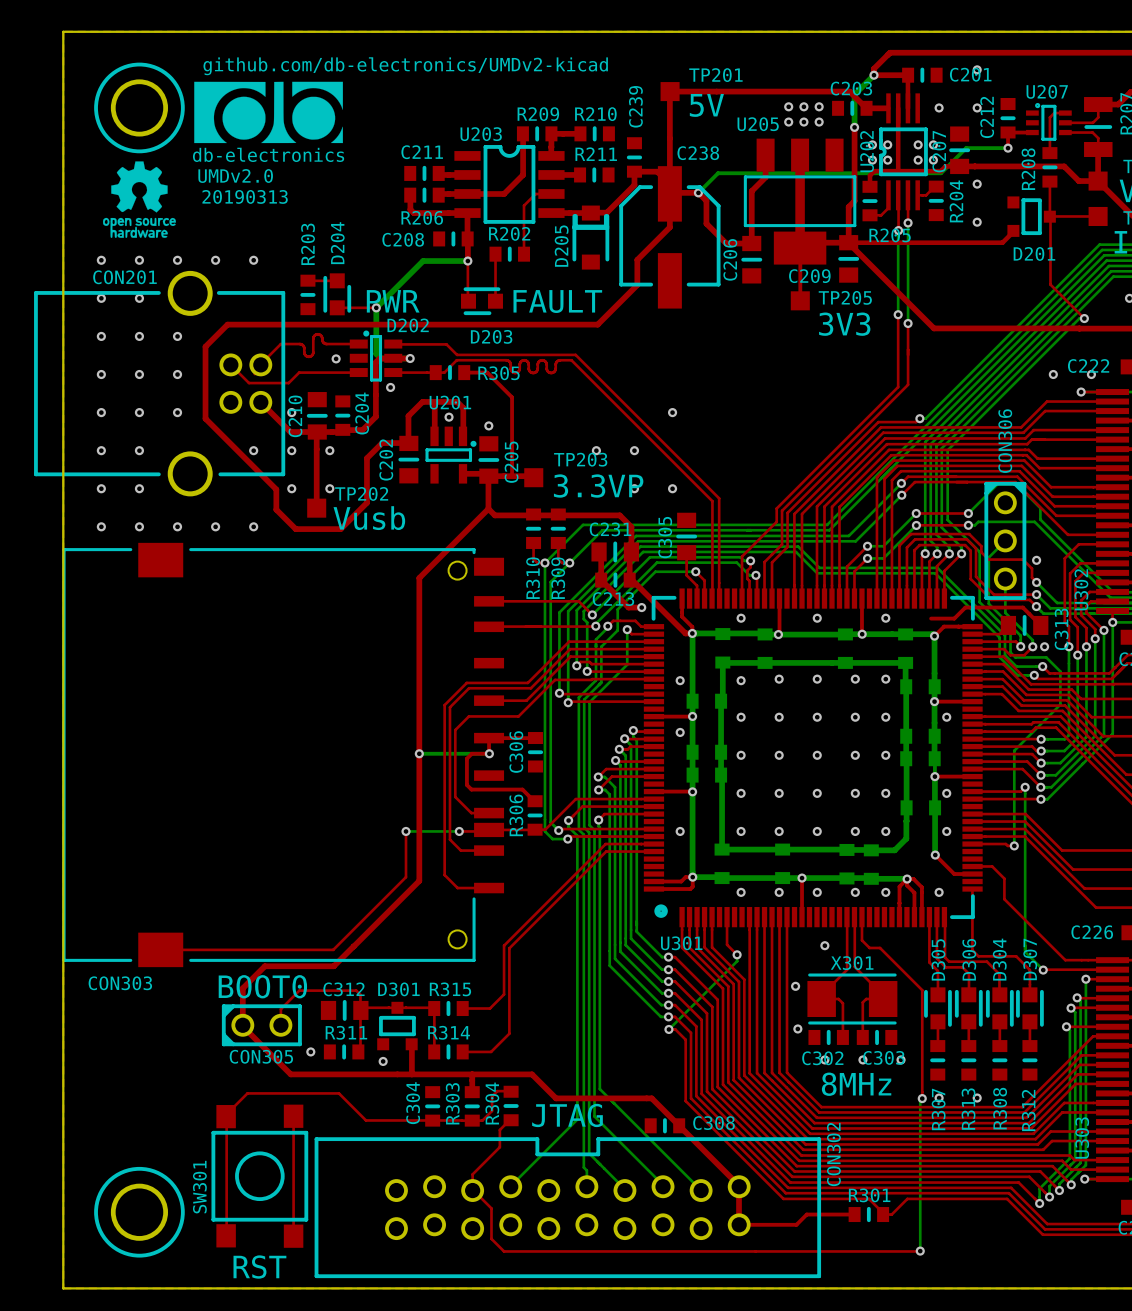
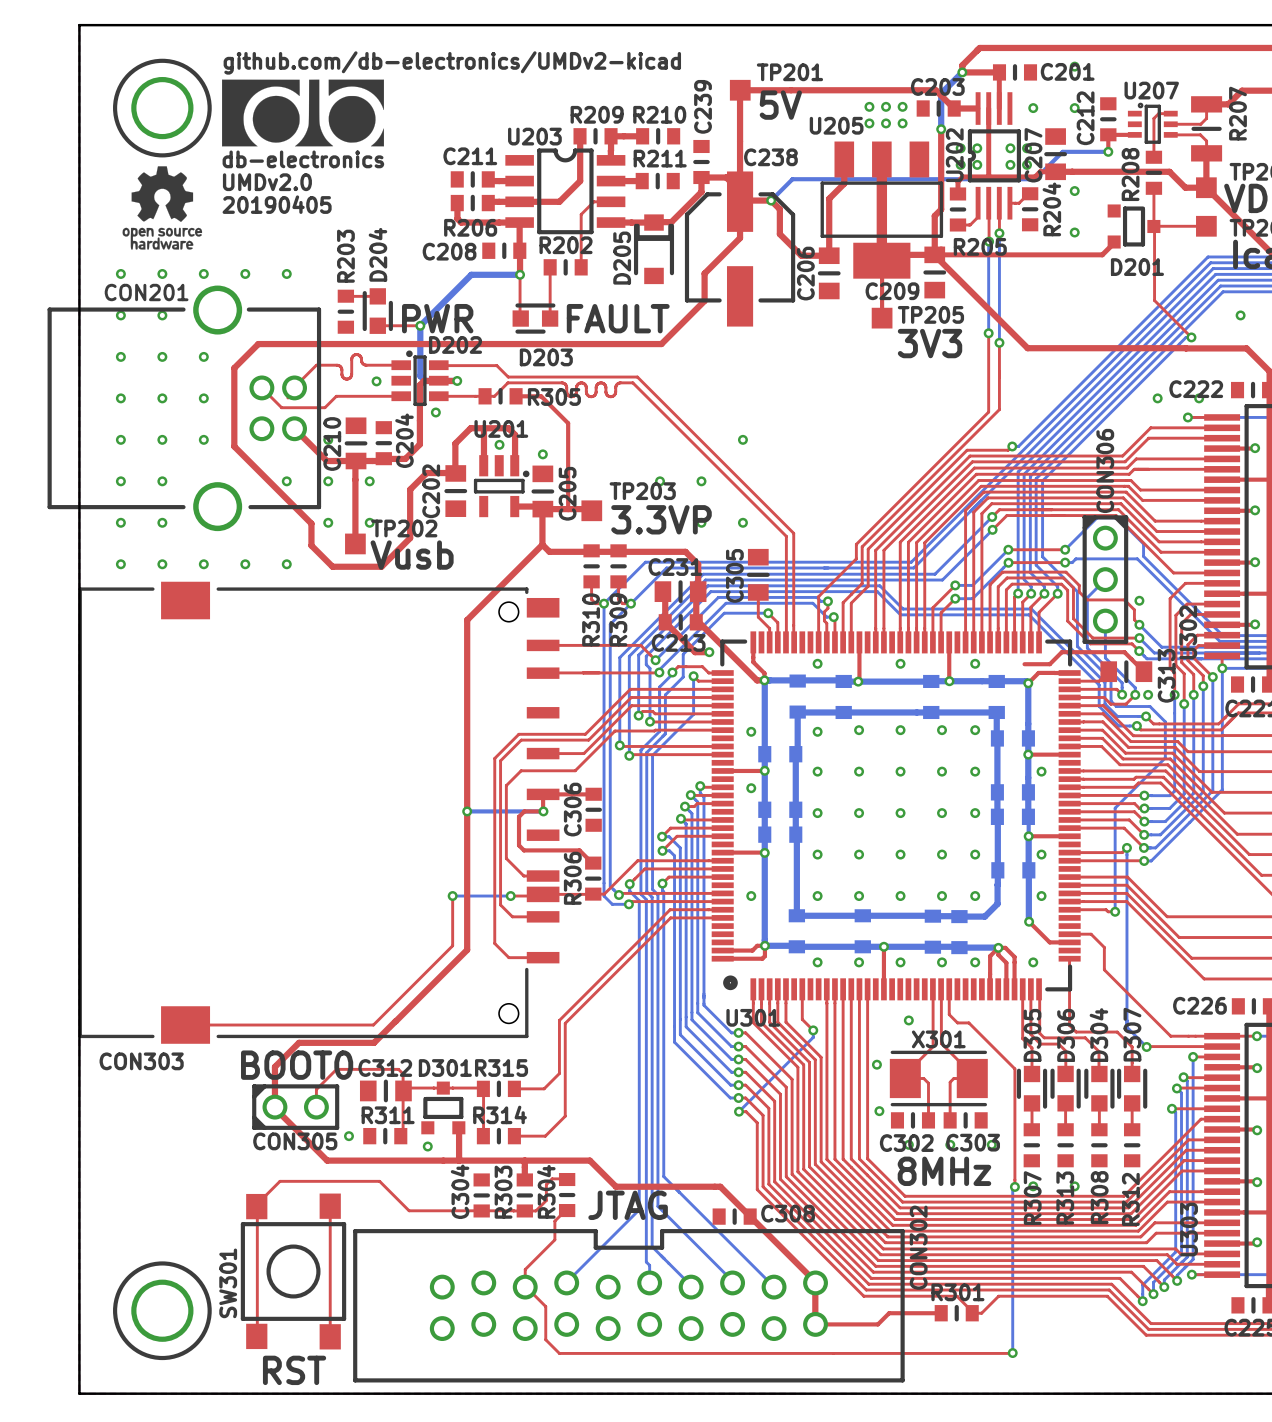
text: 20190313 (245, 196) -> 20190405 (277, 204)

